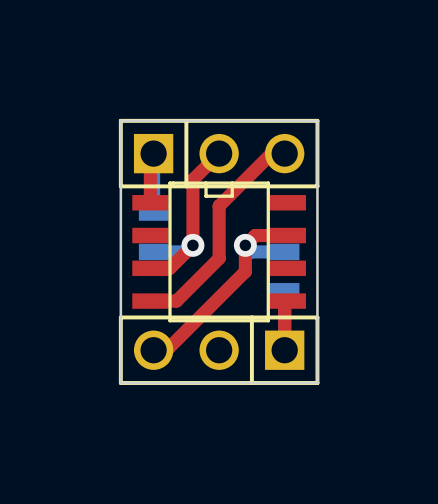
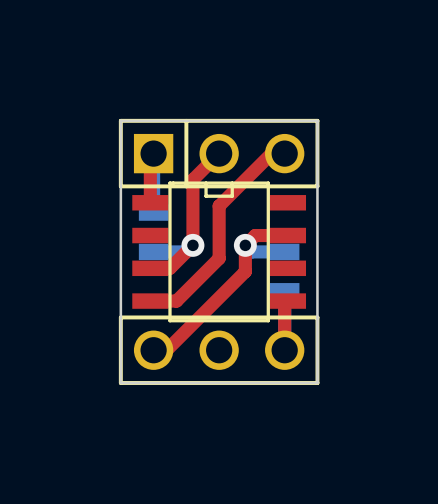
part footprint: [118, 315, 320, 385] -> [118, 315, 320, 385]

